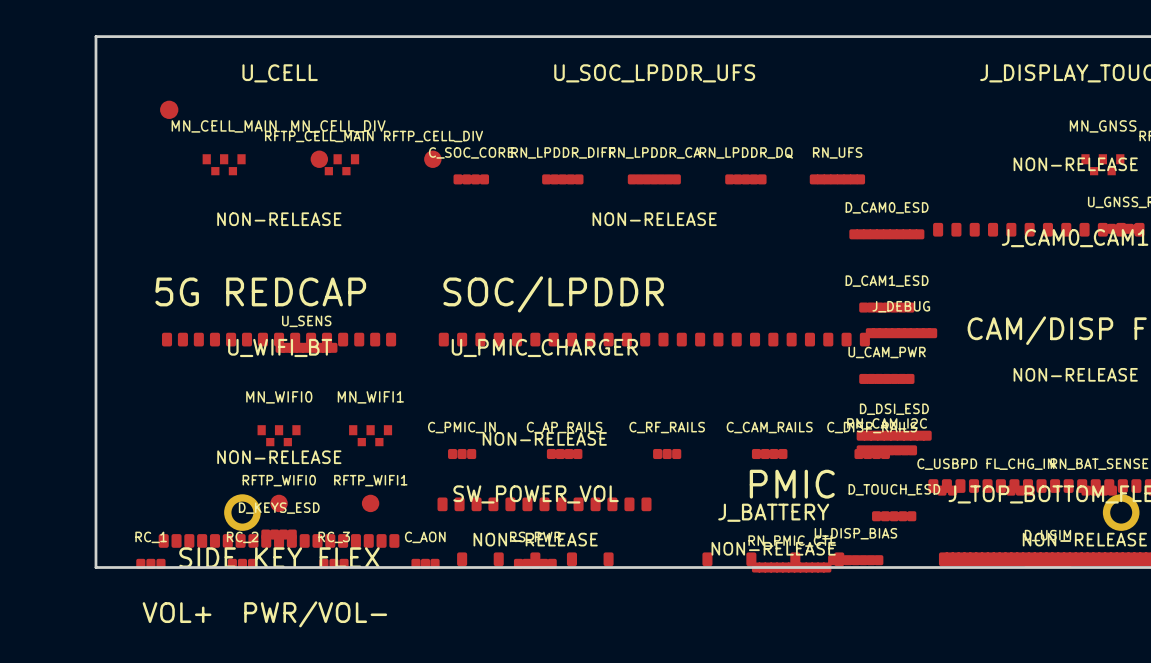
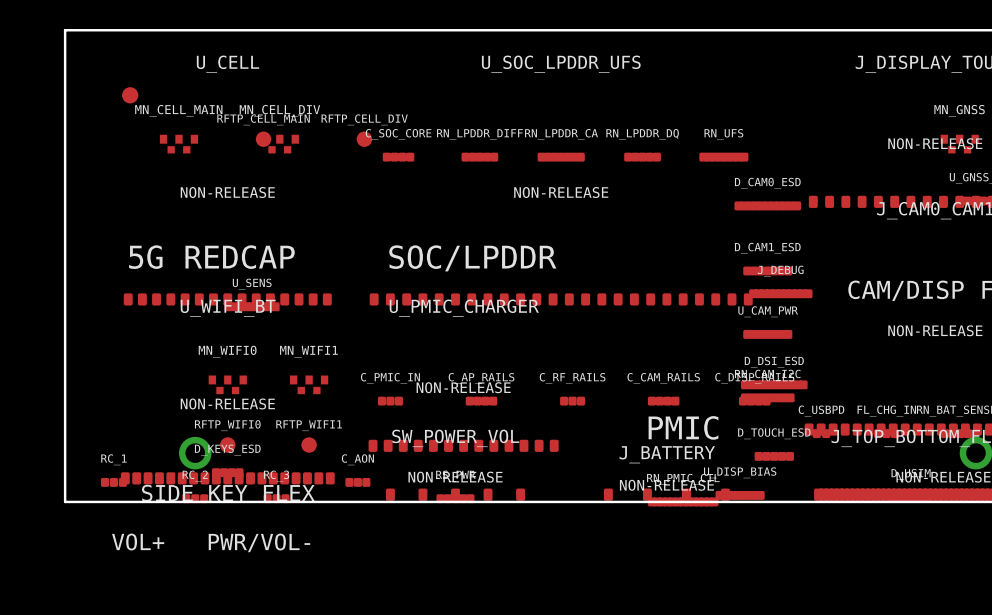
RC_1 position: (150, 563) -> (113, 482)
C_AON position: (425, 563) -> (357, 482)

